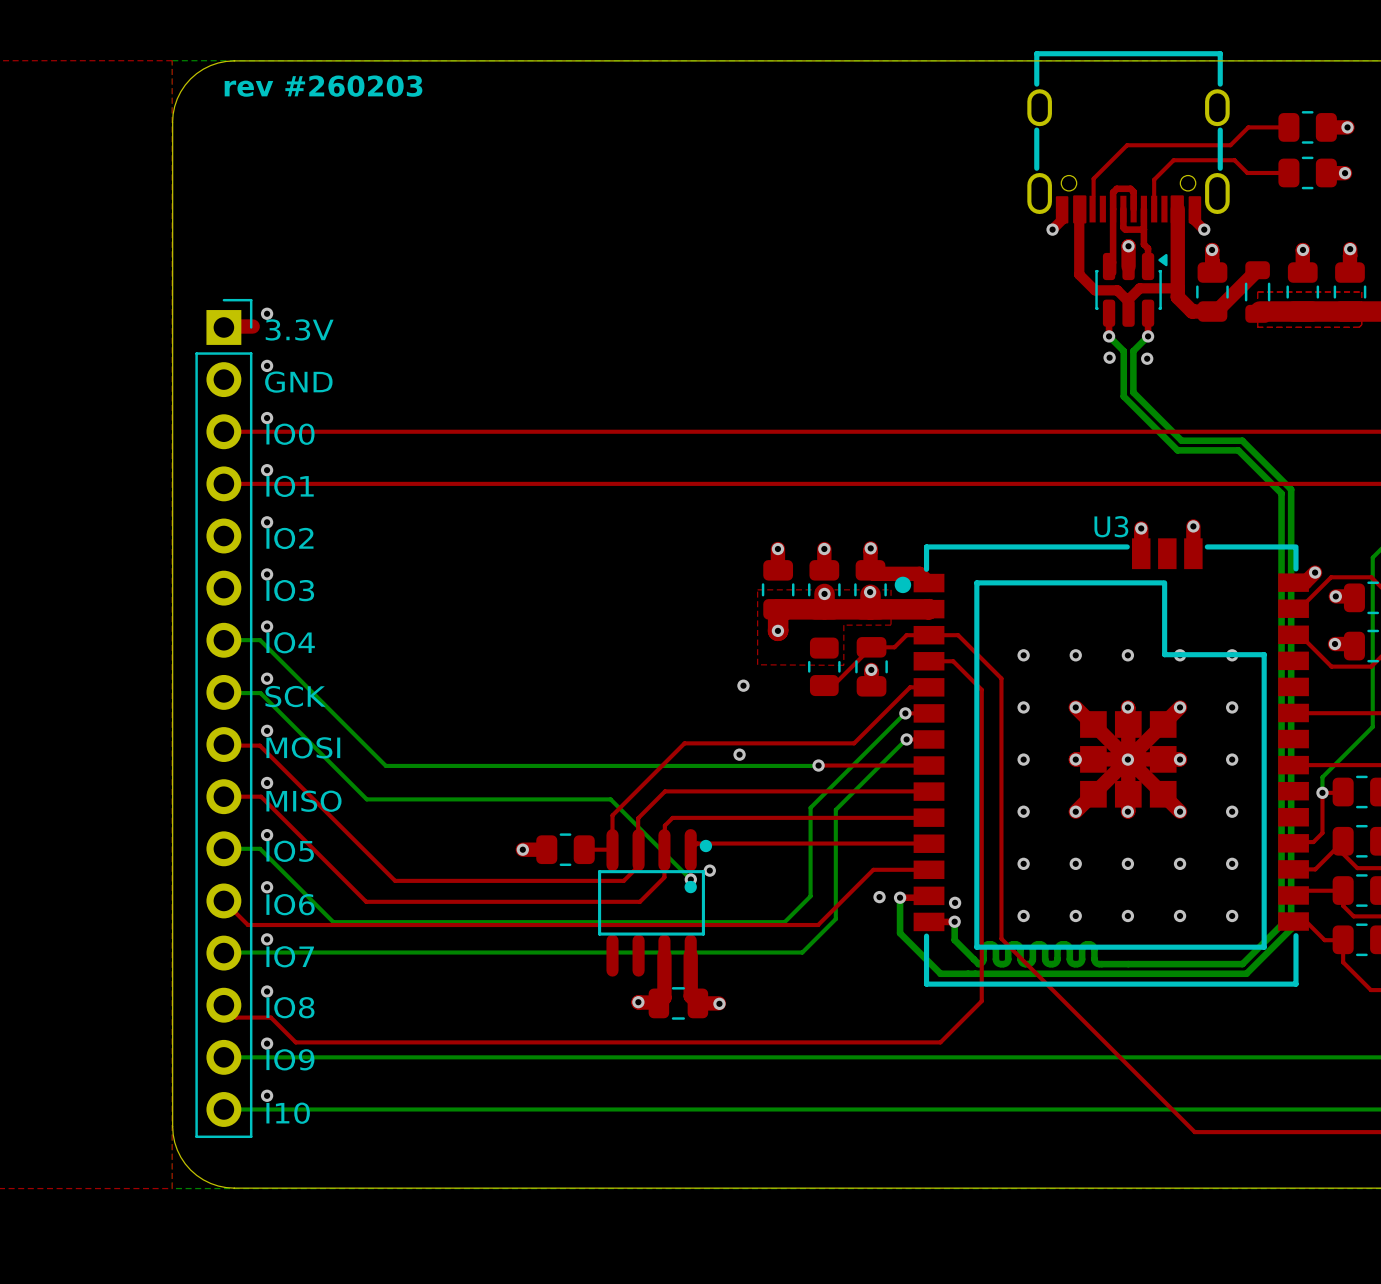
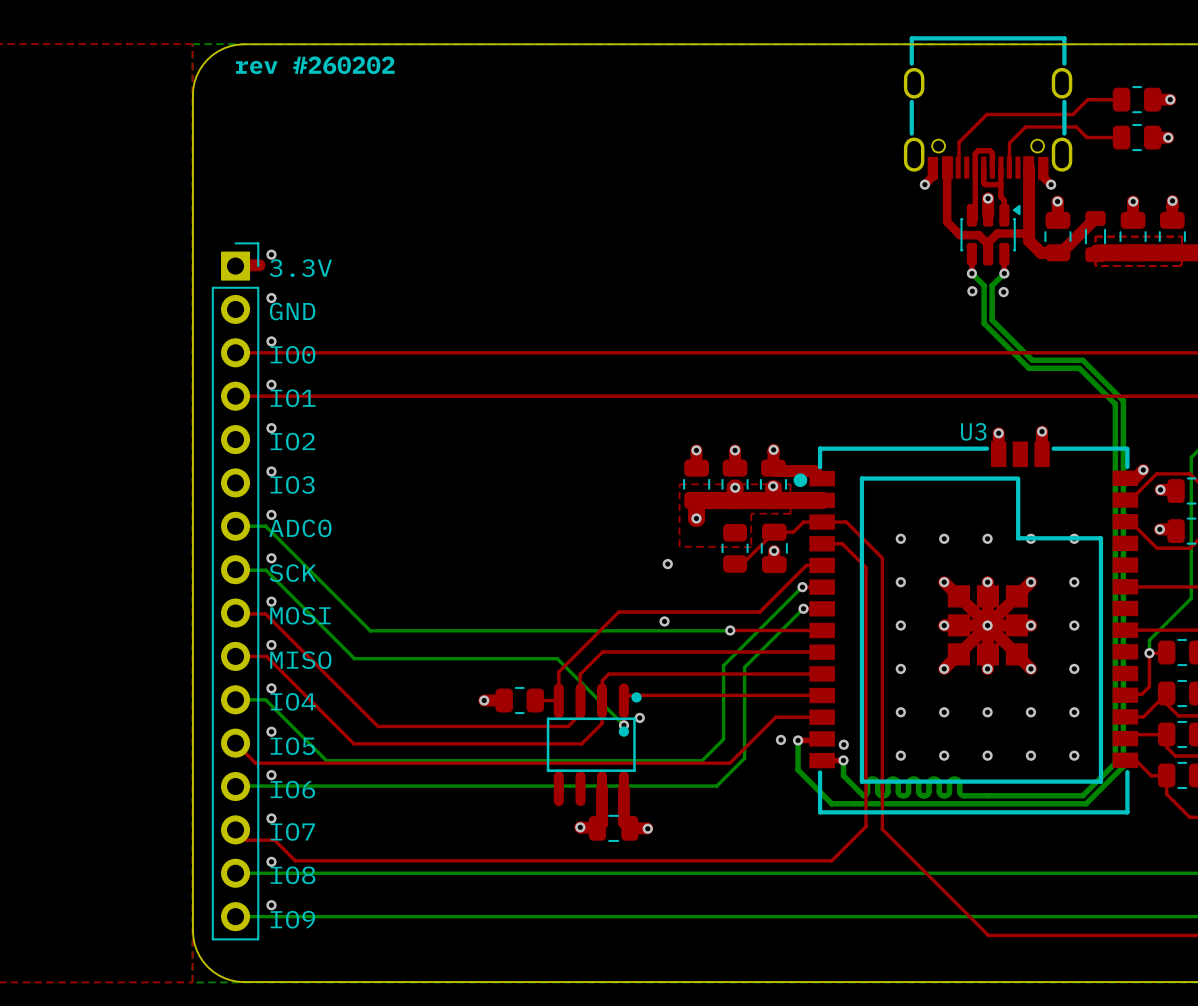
text: rev #260203 (323, 86) -> rev #260202 (315, 65)
text: IO4 (290, 642) -> ADC0 (300, 528)
text: IO5 (290, 851) -> IO4 (293, 701)
text: IO6 (290, 904) -> IO5 (292, 746)
top track: (1001, 938) (1194, 1132) -> (882, 774) (882, 829) (988, 935) (1043, 935)
text: IO7 (290, 956) -> IO6 (292, 789)
text: IO8 (290, 1007) -> IO7 (292, 831)
text: IO9 (290, 1059) -> IO8 (293, 875)
text: I10 (288, 1113) -> IO9 (292, 919)

